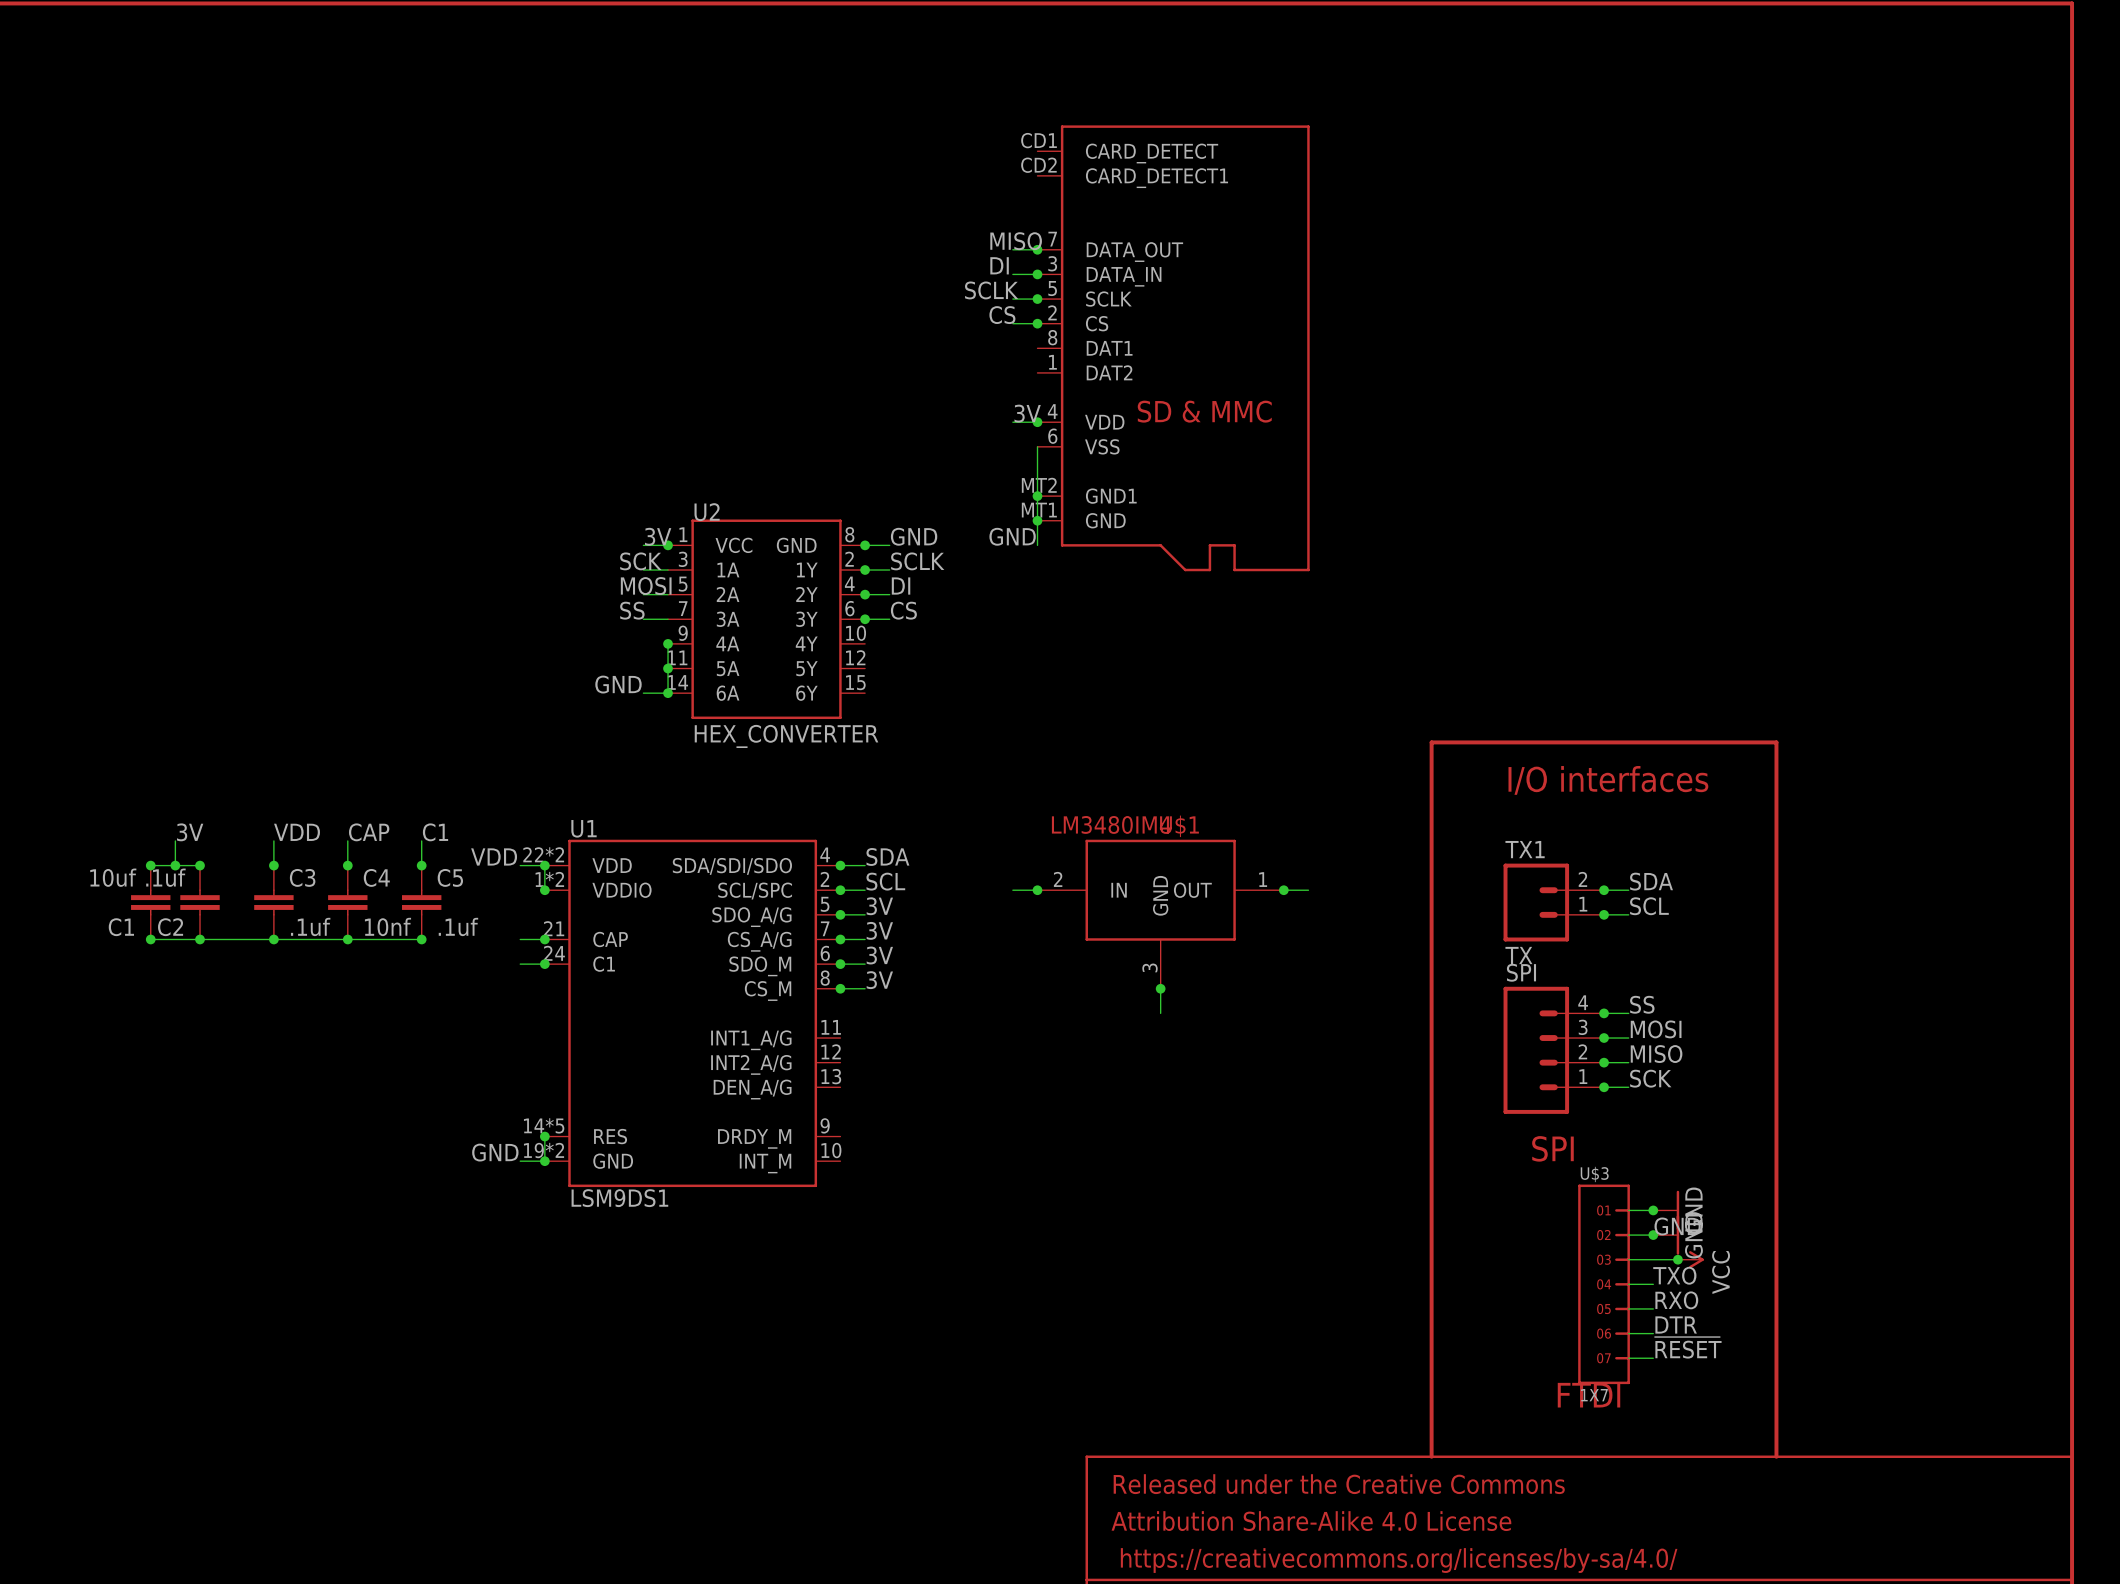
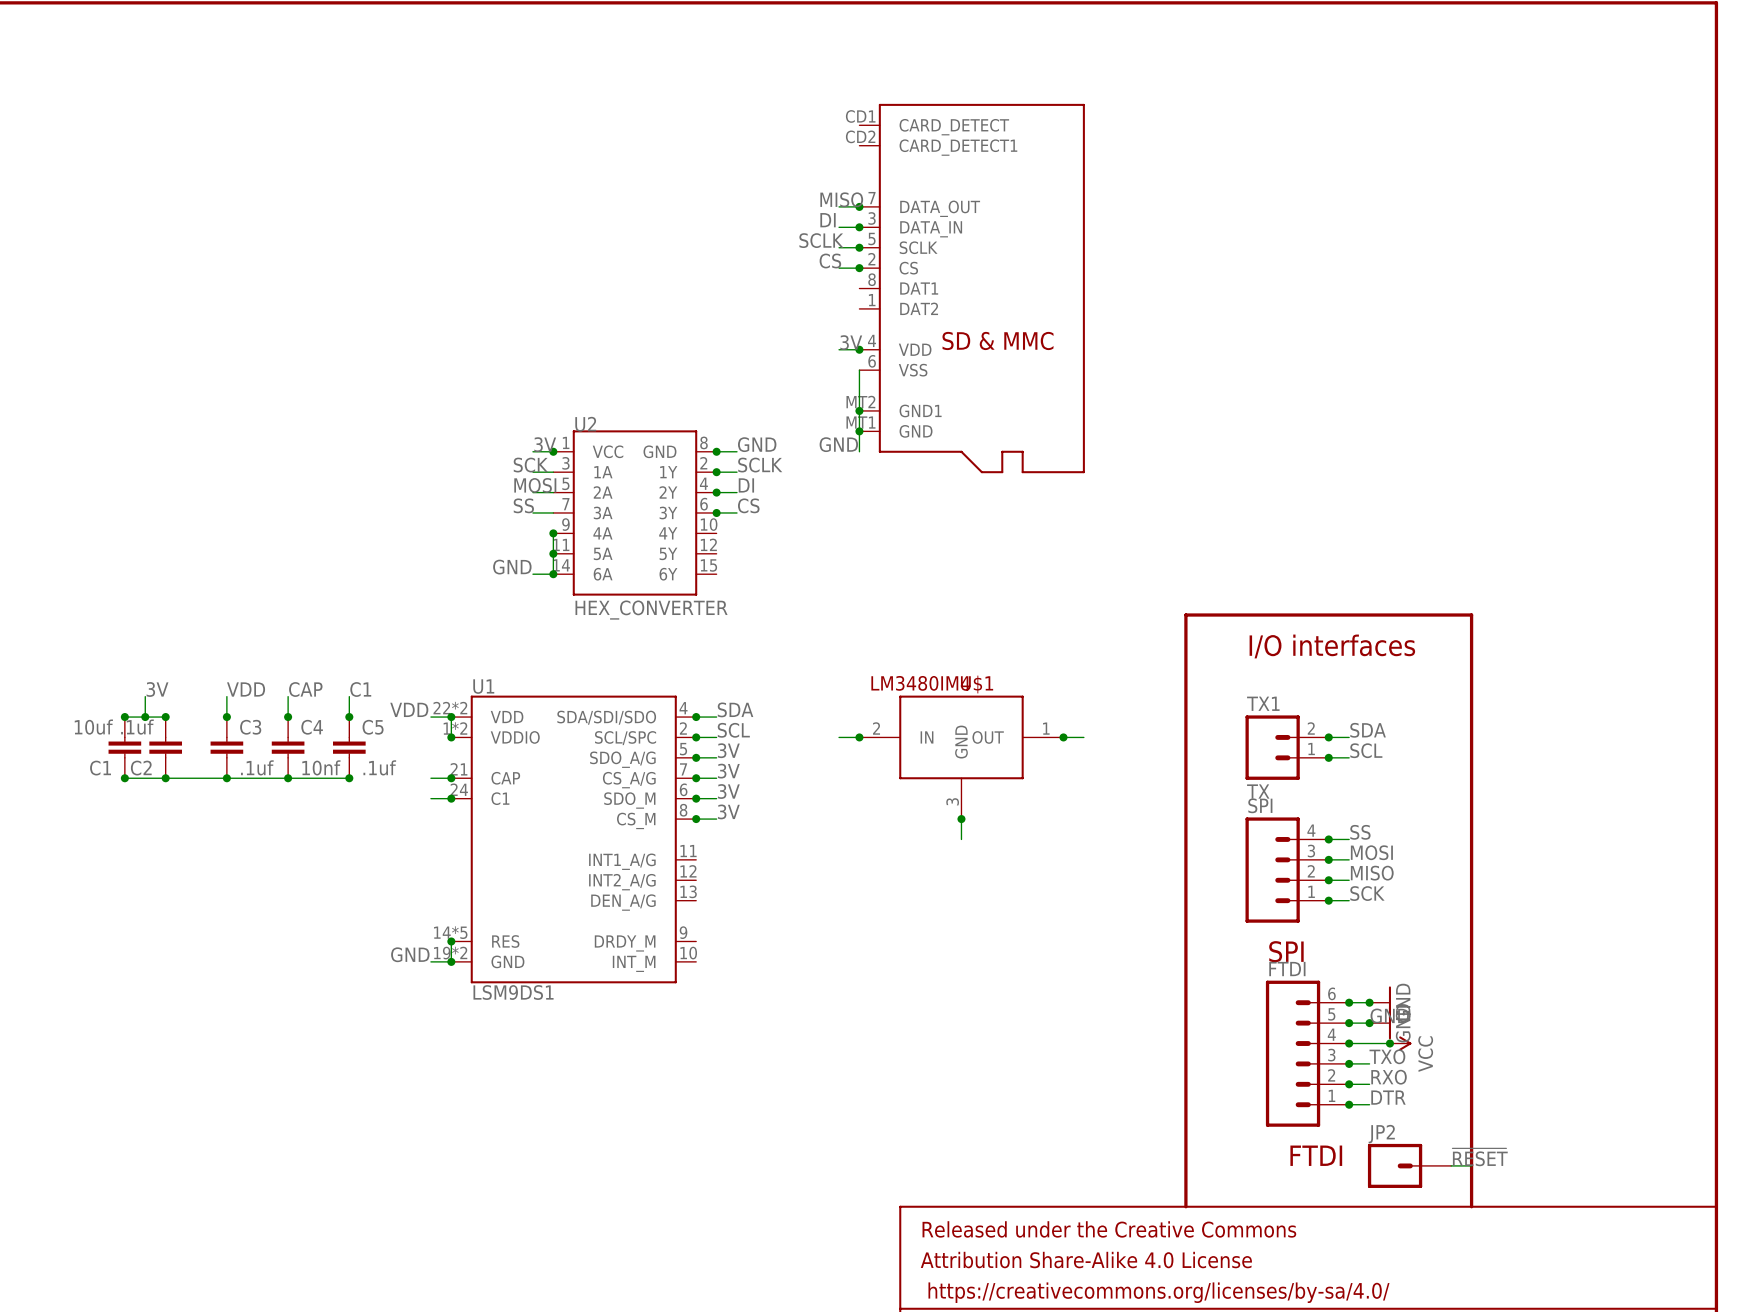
junction: none -> (1349, 1002)
junction: none -> (1349, 1023)
junction: none -> (1349, 1043)
FTDI: none -> (1307, 1053)
U$3: 1X7 (1604, 1284) -> none
junction: none -> (1349, 1063)
junction: none -> (1349, 1084)
junction: none -> (1349, 1104)
label position: ~{RESET} (1688, 1347) -> ~{RESET} (1480, 1157)
wire: (1628, 1358) (1653, 1358) -> (1451, 1165) (1471, 1165)
JP2: none -> (1409, 1165)

